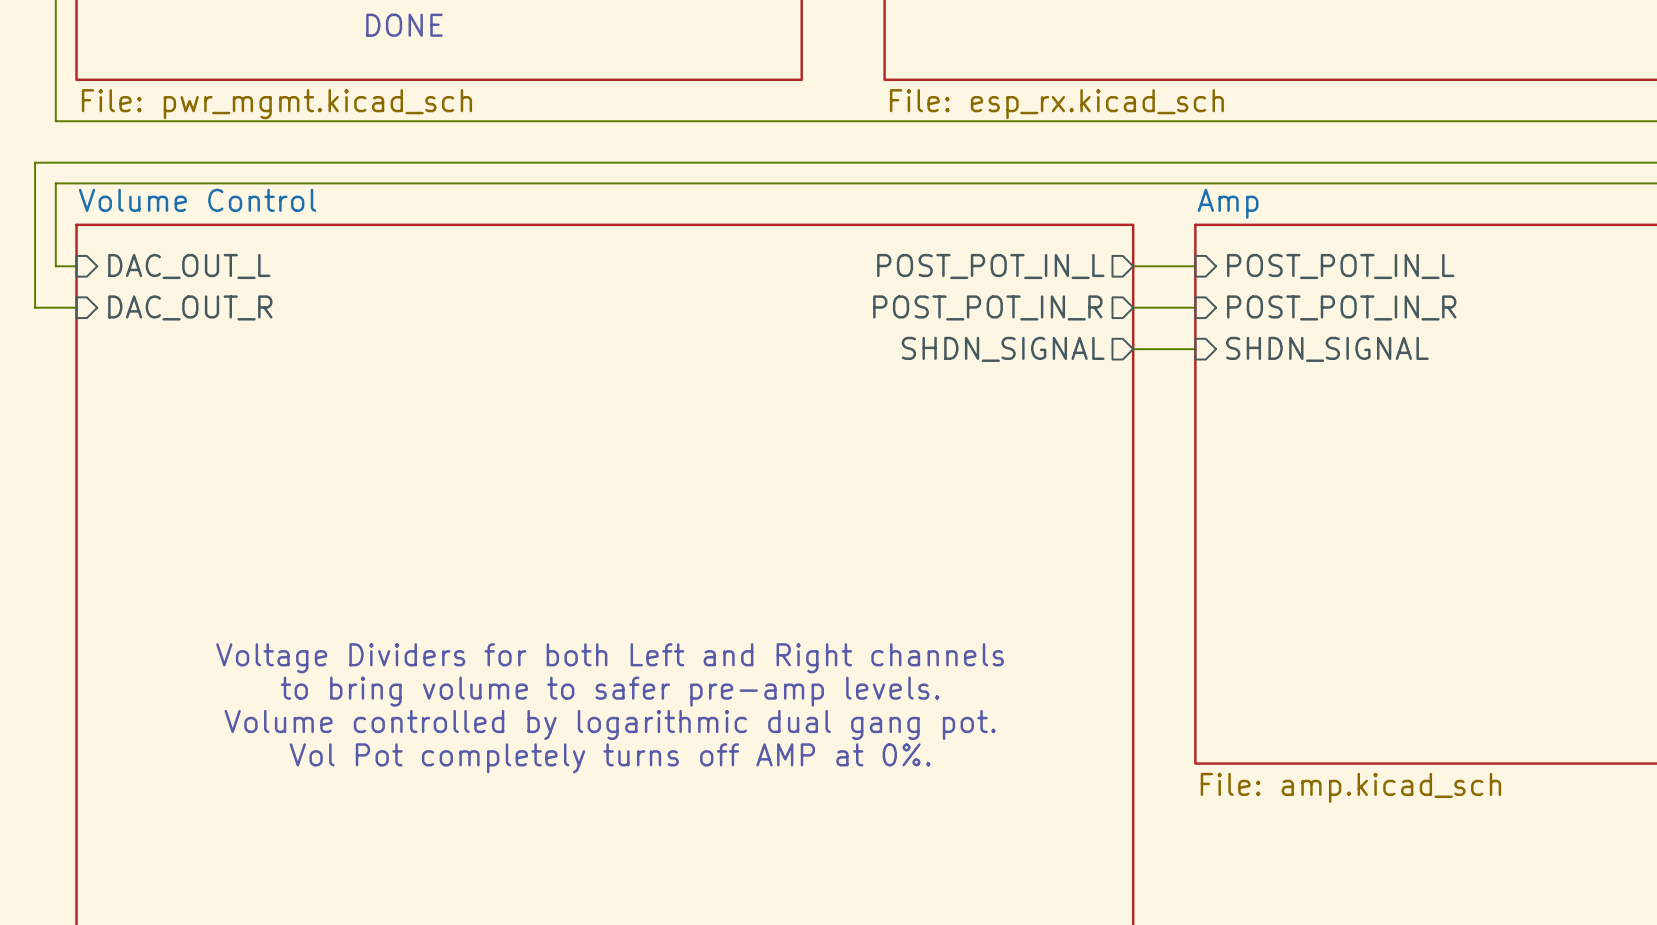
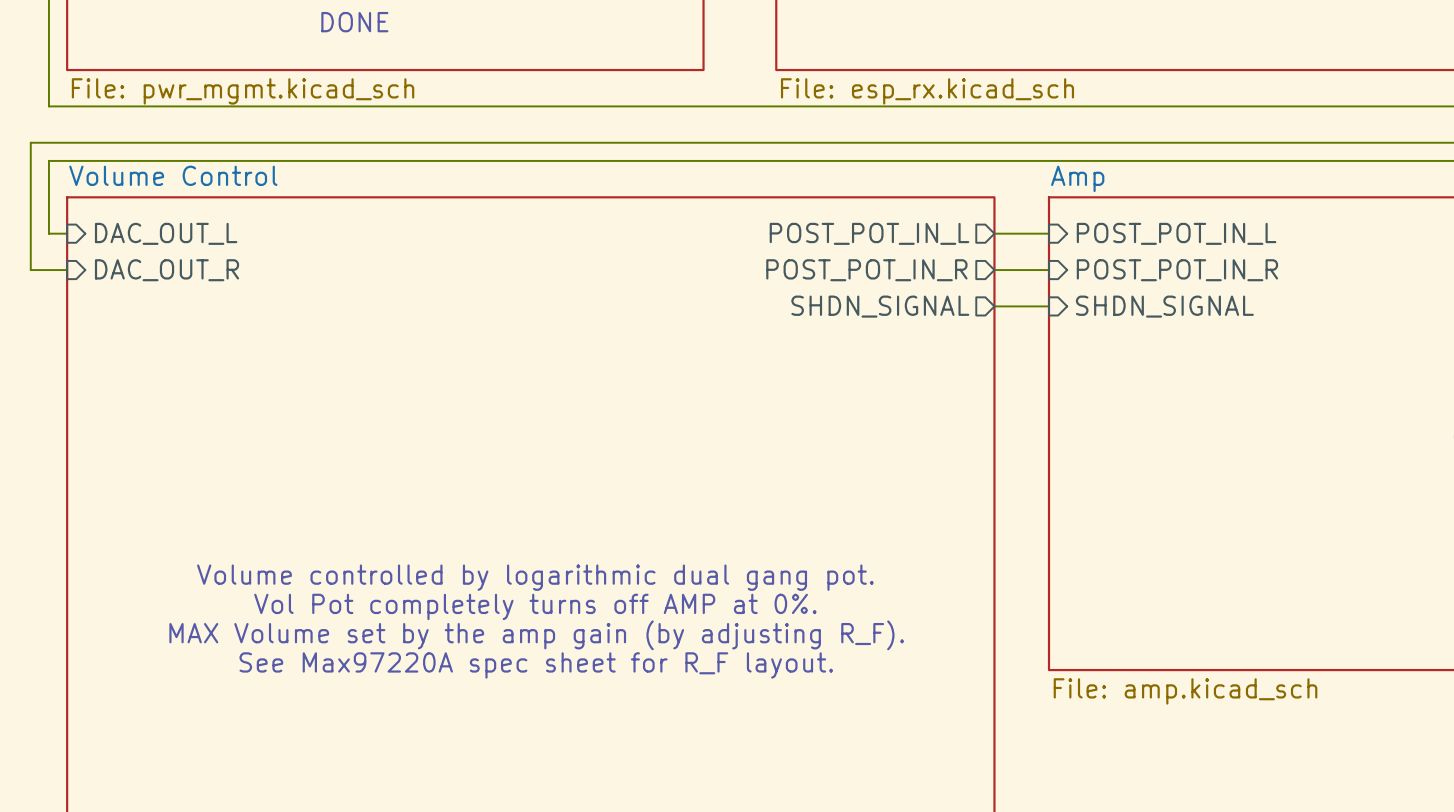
text: Voltage Dividers for both Left and Right channels (610, 658) -> Volume controlled by logarithmic dual gang pot. (535, 577)
text: to bring volume to safer pre-amp levels. (610, 691) -> Vol Pot completely turns off AMP at 0%. (535, 606)
text: Volume controlled by logarithmic dual gang pot. (610, 724) -> MAX Volume set by the amp gain (by adjusting R_F). (536, 635)
text: Vol Pot completely turns off AMP at 0%. (610, 758) -> See Max97220A spec sheet for R_F layout. (536, 665)

